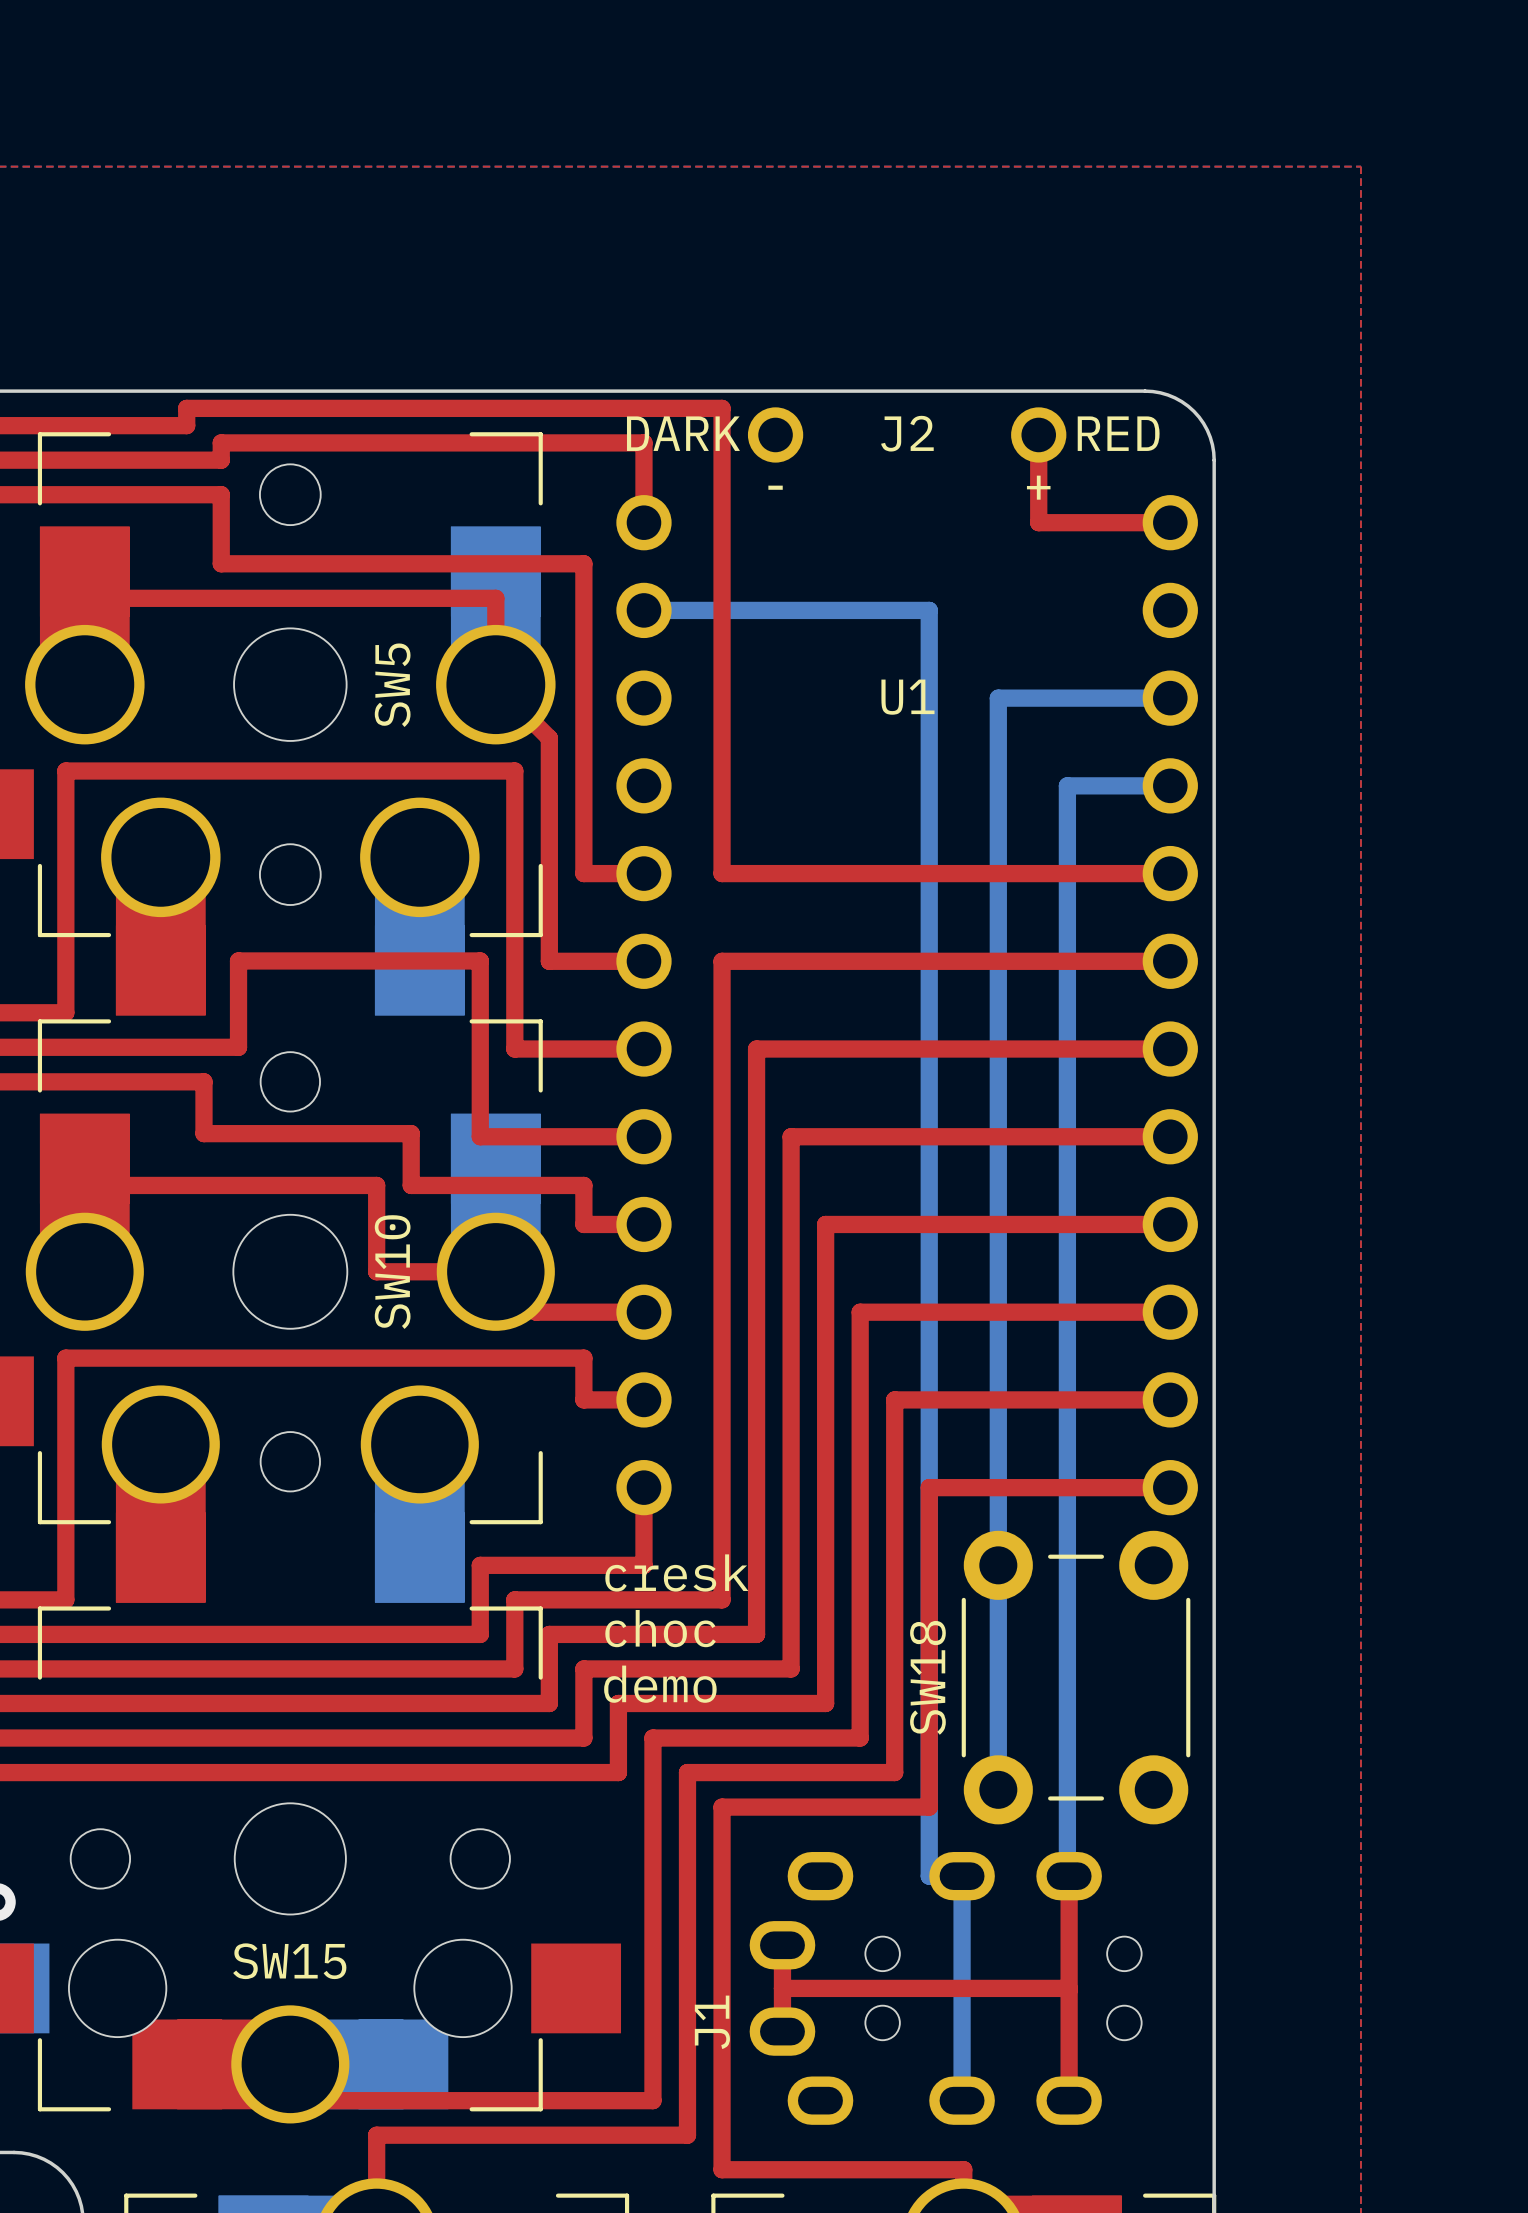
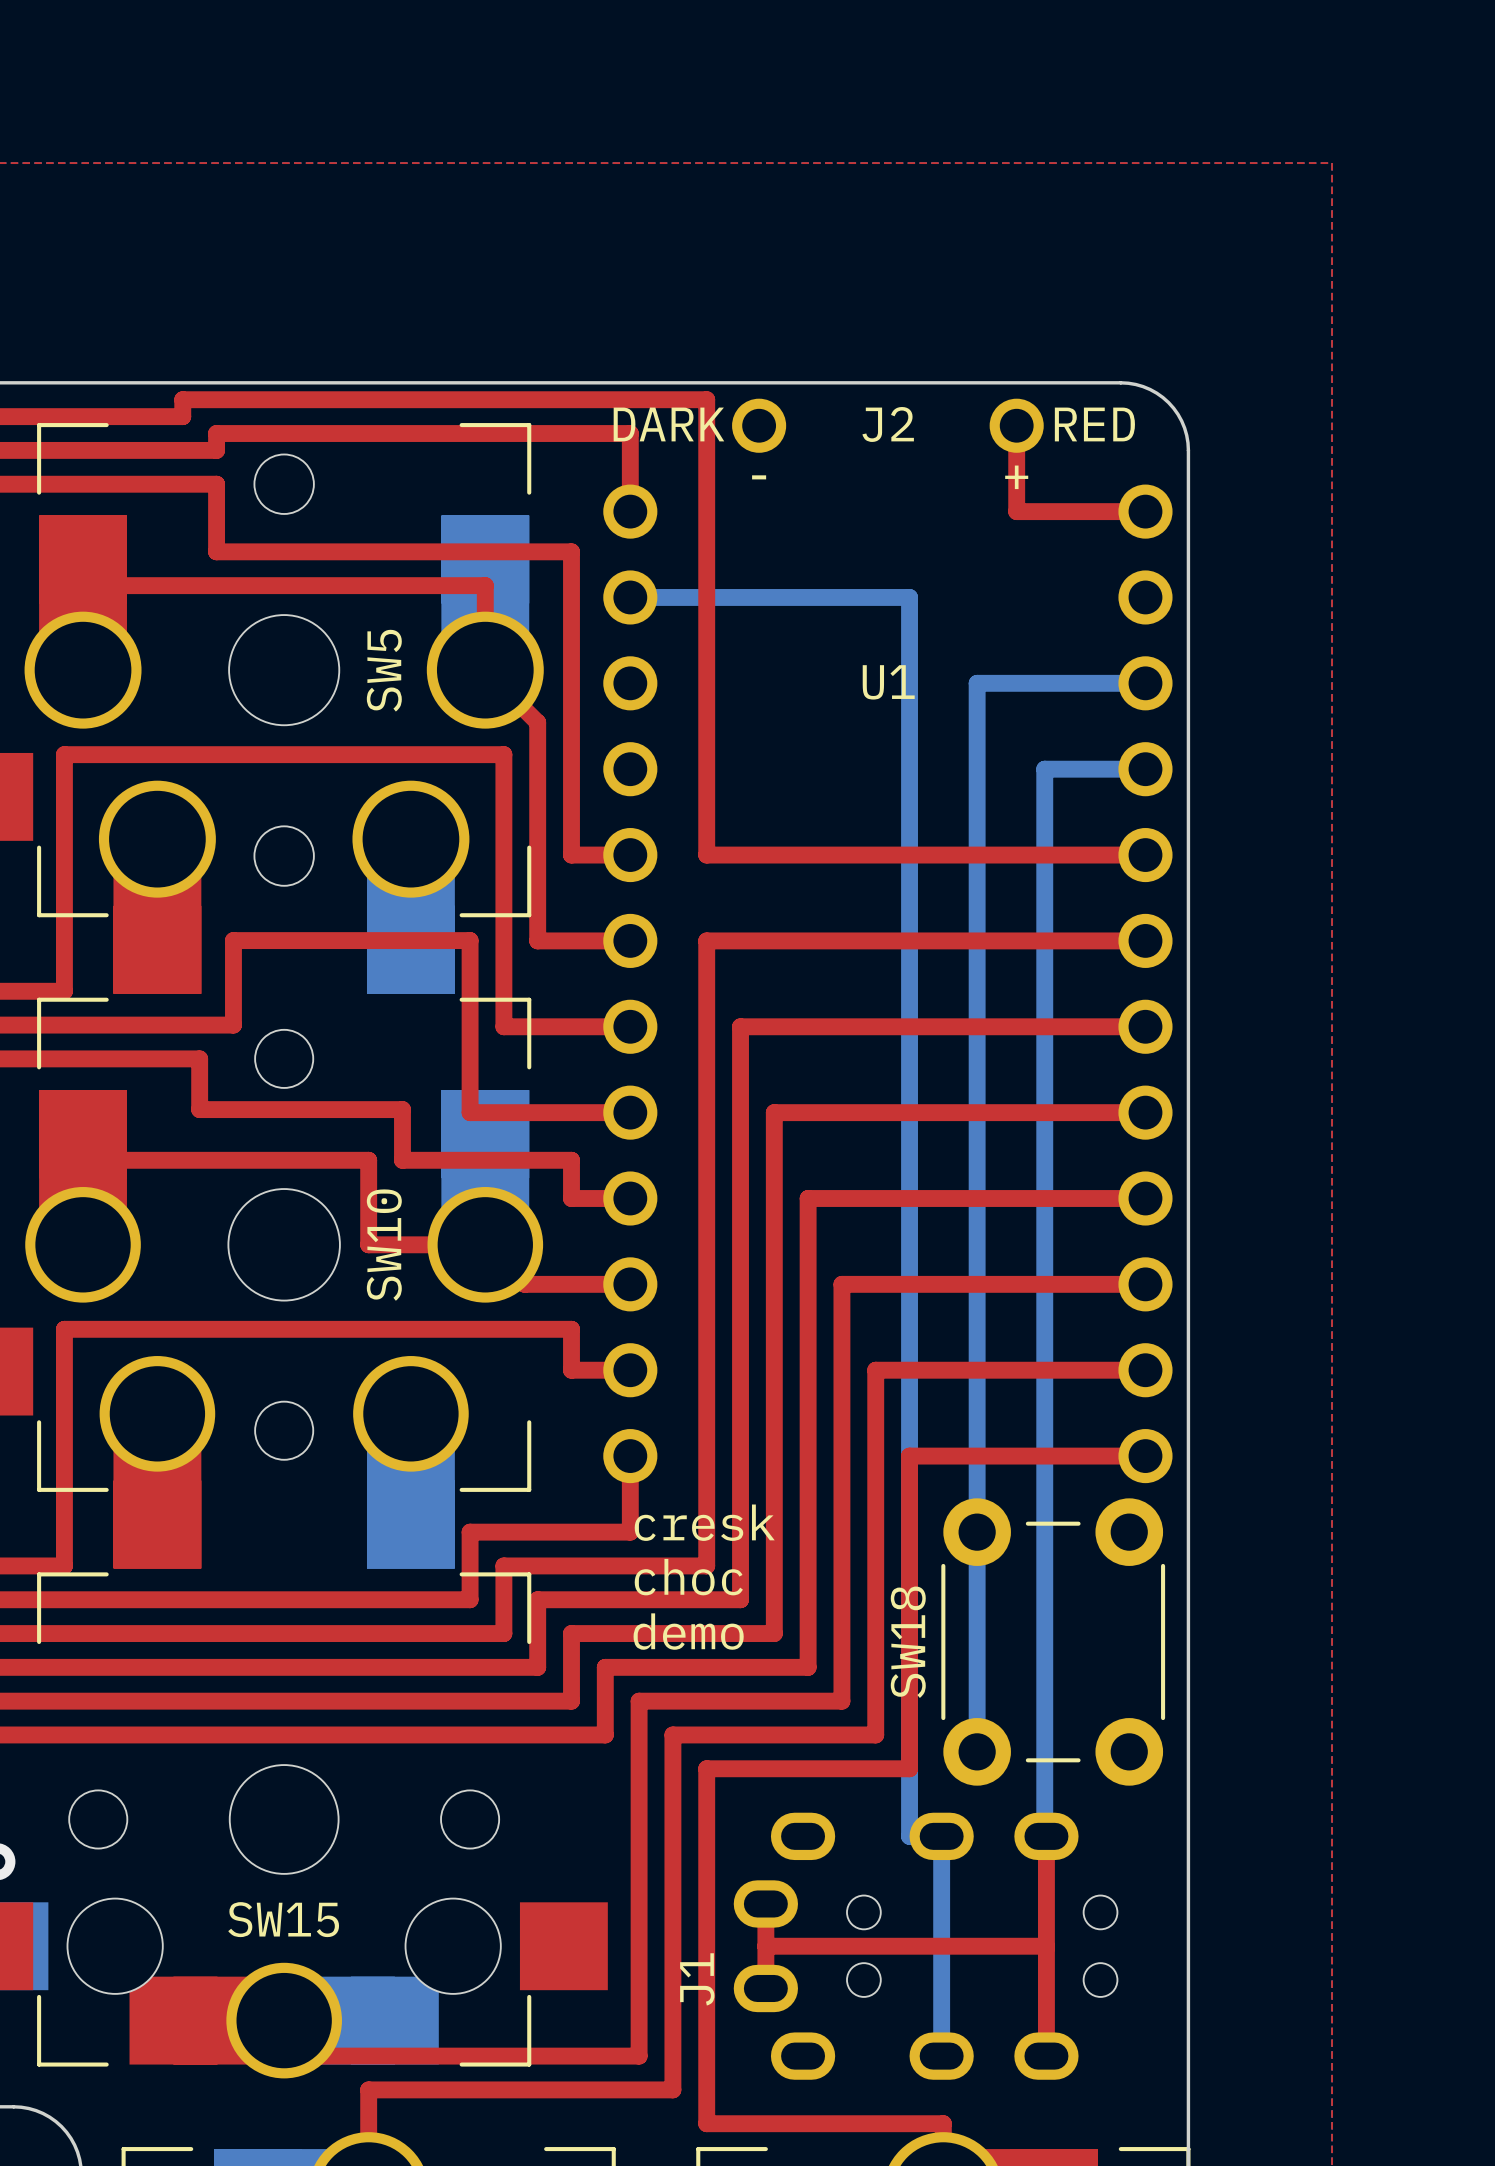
text position: cresk (676, 1572) -> cresk (704, 1522)
text position: choc (660, 1628) -> choc (688, 1577)
text position: demo (660, 1684) -> demo (688, 1631)

